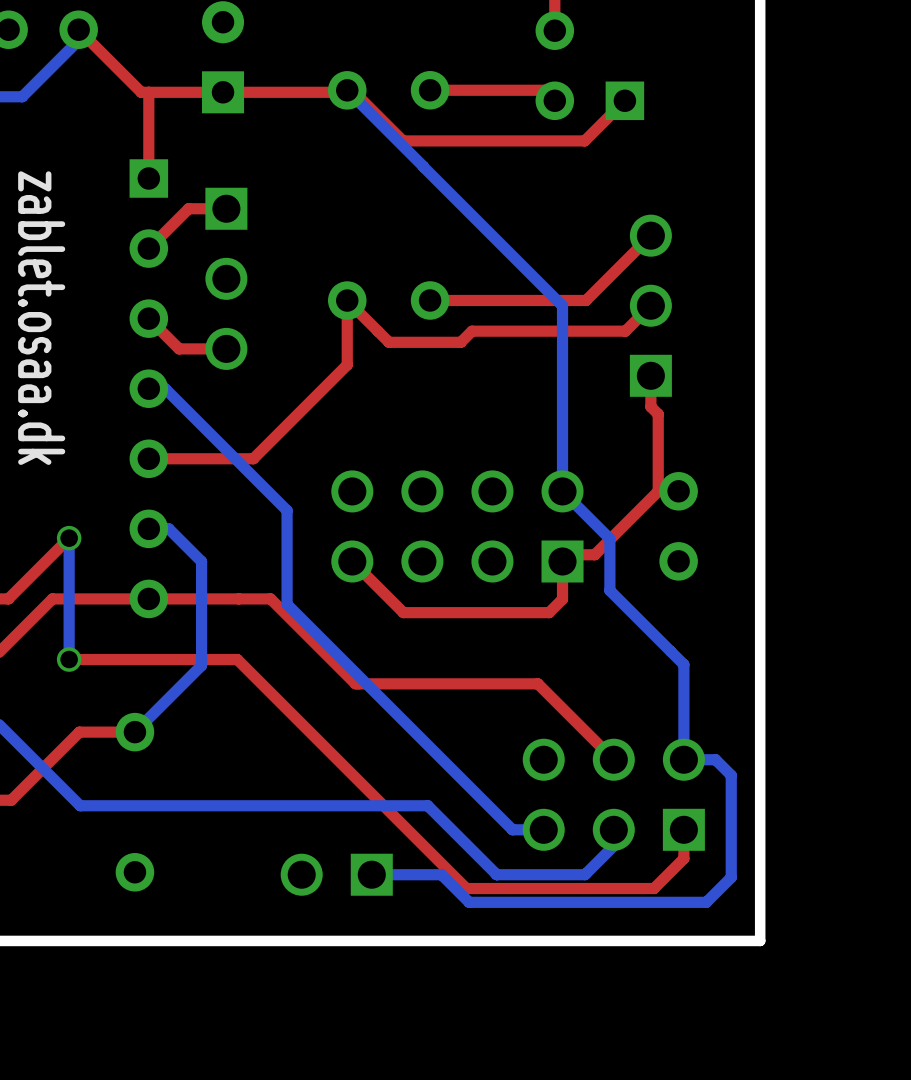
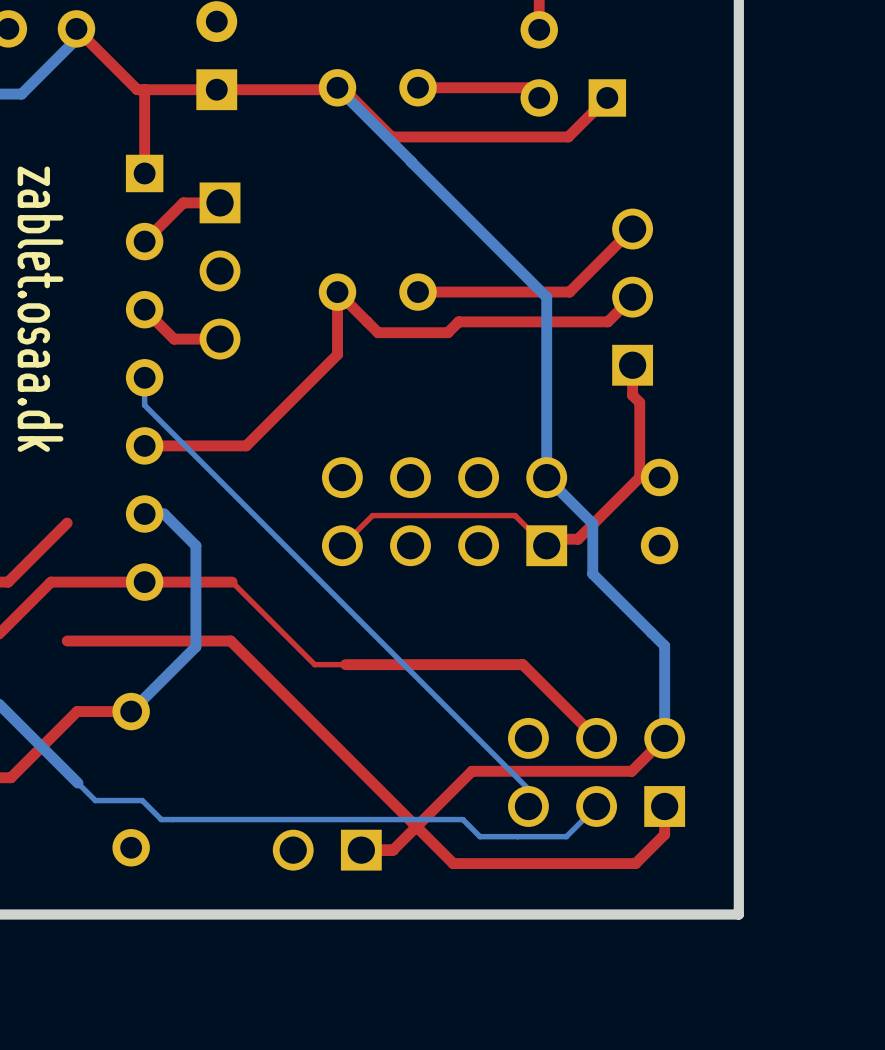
bottom track: (148, 388) (165, 388) (287, 510) (287, 604) (512, 829) (543, 829) -> (144, 377) (144, 405) (528, 789) (528, 806)
bottom track: (69, 538) (69, 659) -> none
via: (69, 538) -> none
top track: (562, 561) (562, 599) (549, 612) (403, 612) (352, 561) -> (546, 545) (515, 515) (372, 515) (342, 545)
top track: (238, 598) (270, 598) (355, 683) -> (232, 582) (314, 664) (345, 664)
via: (69, 659) -> none
bottom track: (683, 759) (715, 759) (731, 775) (731, 877) (706, 902) (469, 902) (441, 874) (371, 874) -> none
top track: none -> (664, 738) (631, 771) (471, 771) (393, 850) (361, 850)
bottom track: (80, 805) (427, 805) (496, 874) (585, 874) (613, 845) (613, 829) -> (77, 783) (95, 800) (142, 800) (161, 819) (462, 819) (479, 836) (566, 836) (596, 806)

